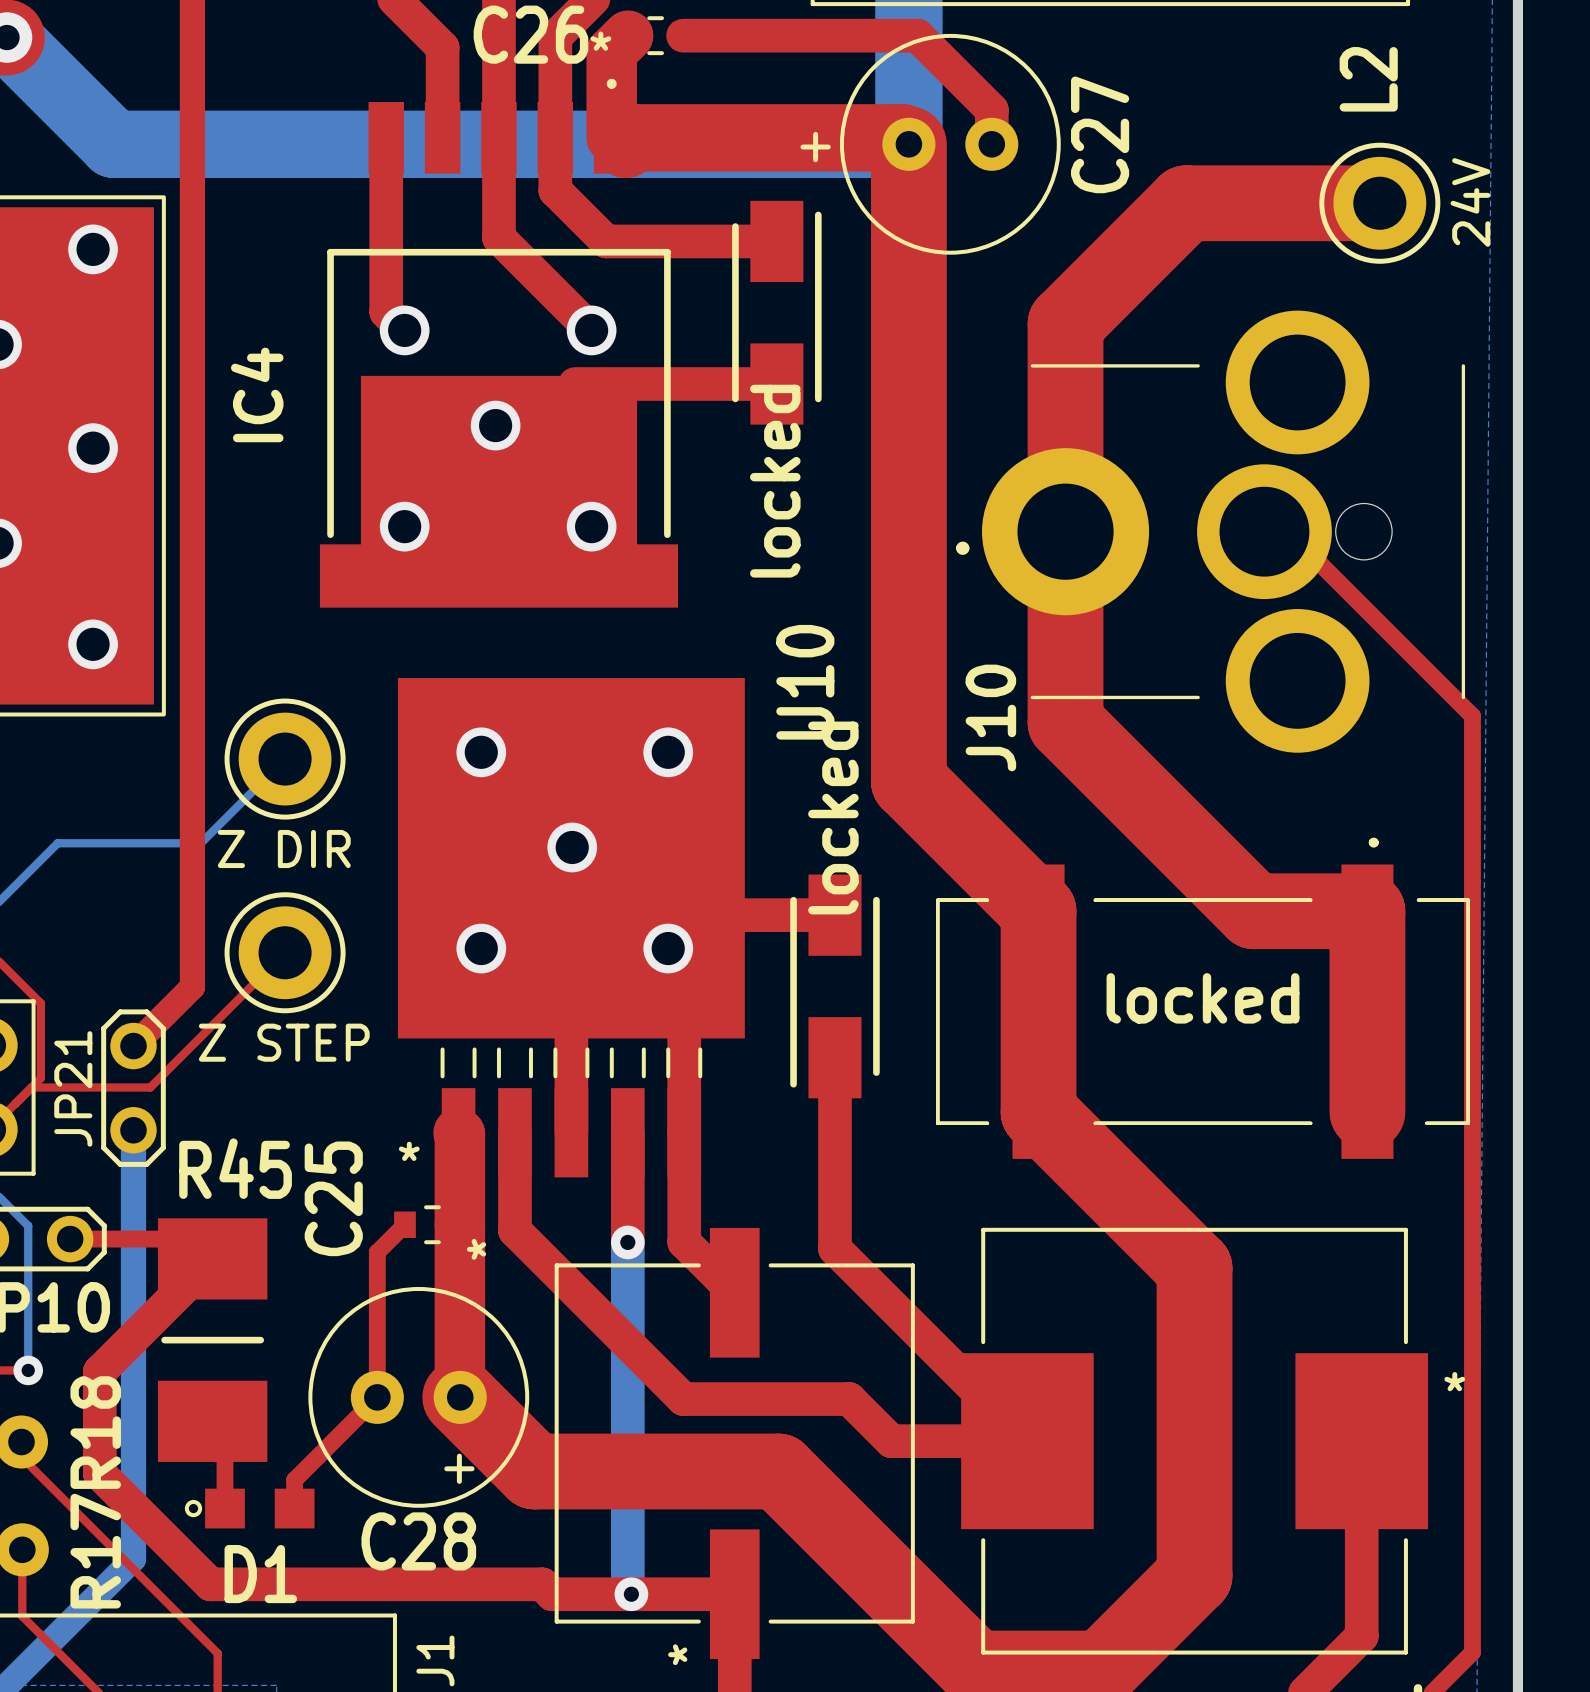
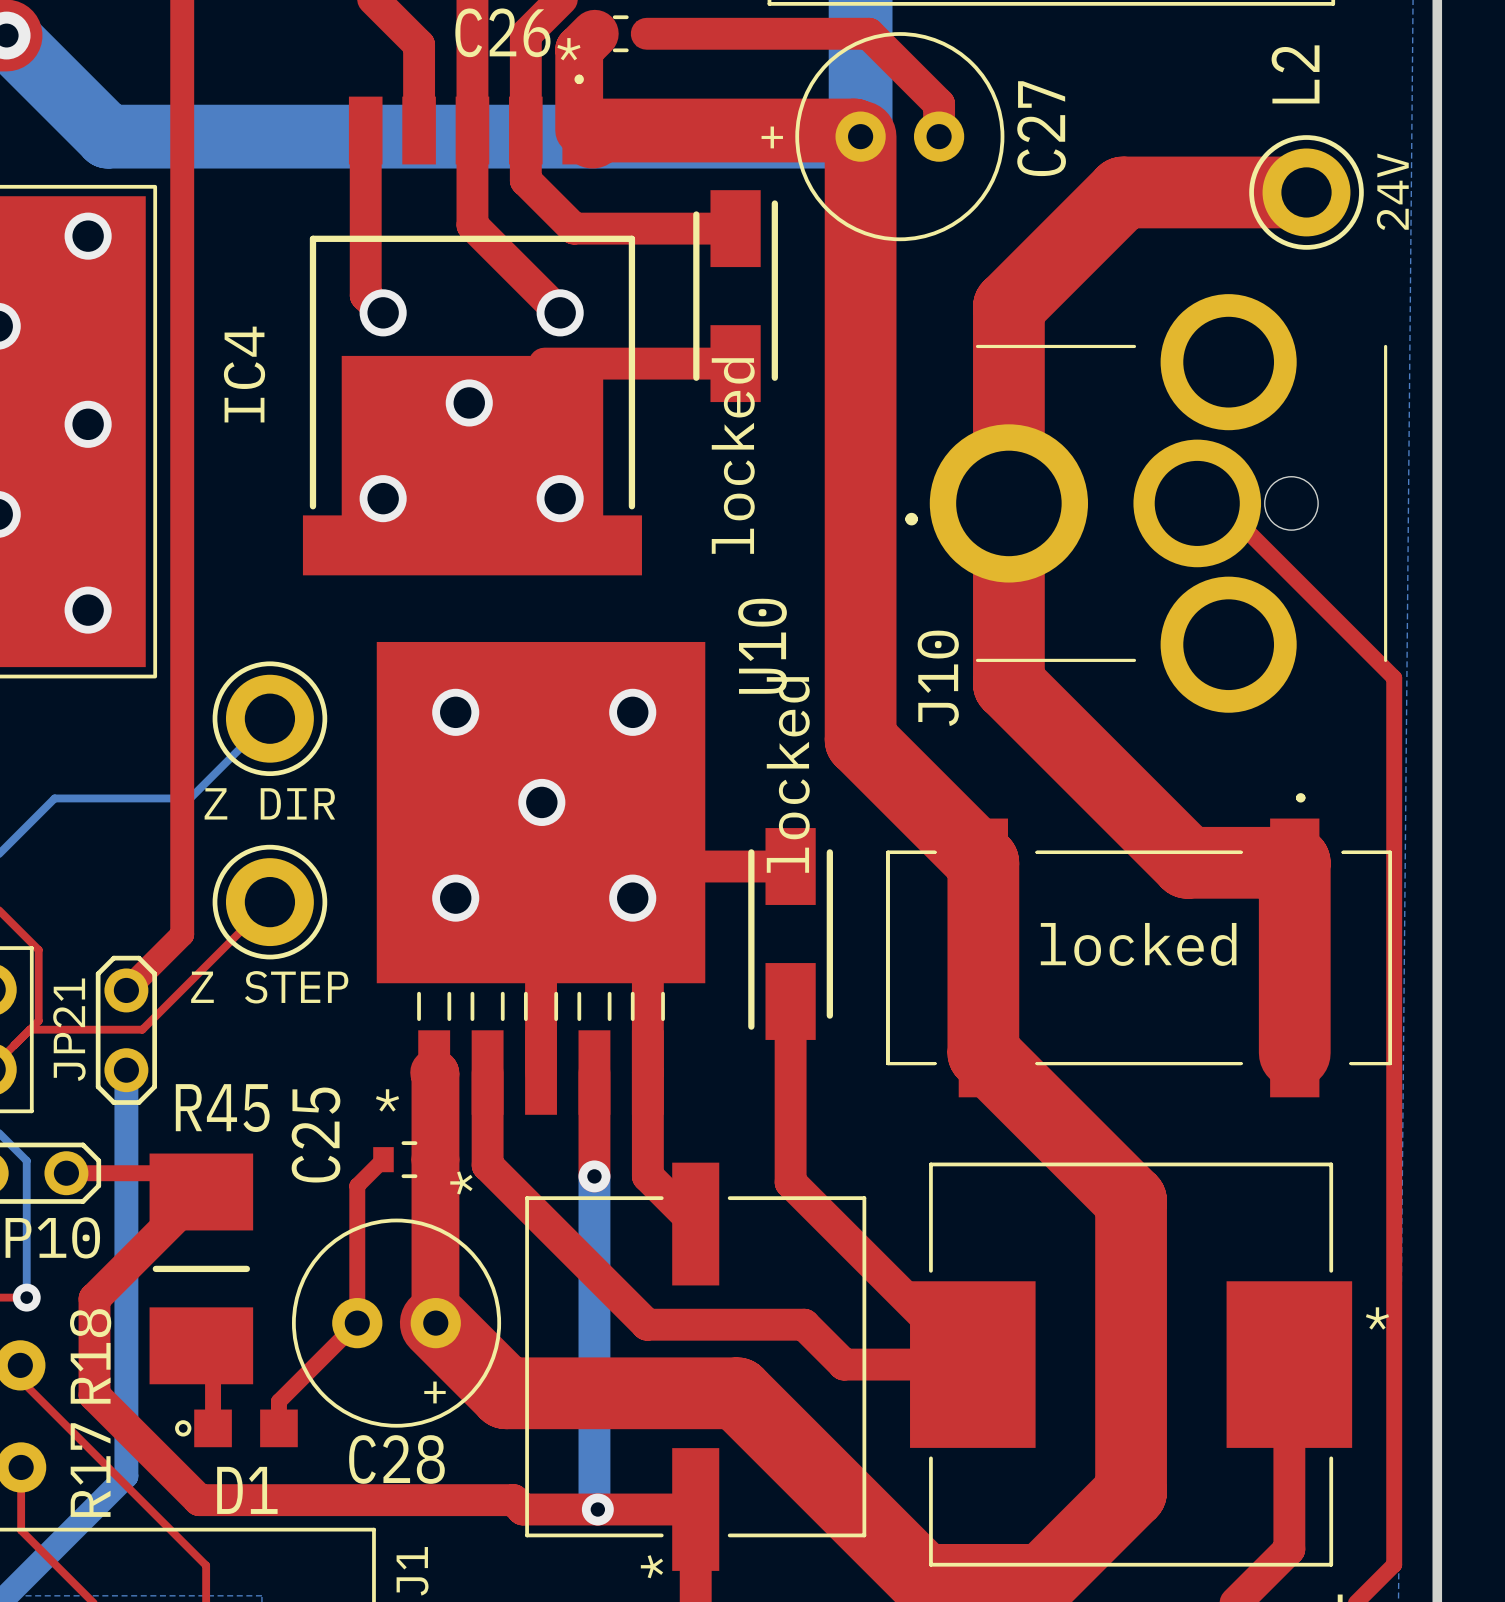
J10 footprint: [956, 310, 1466, 753] -> [905, 294, 1388, 713]

